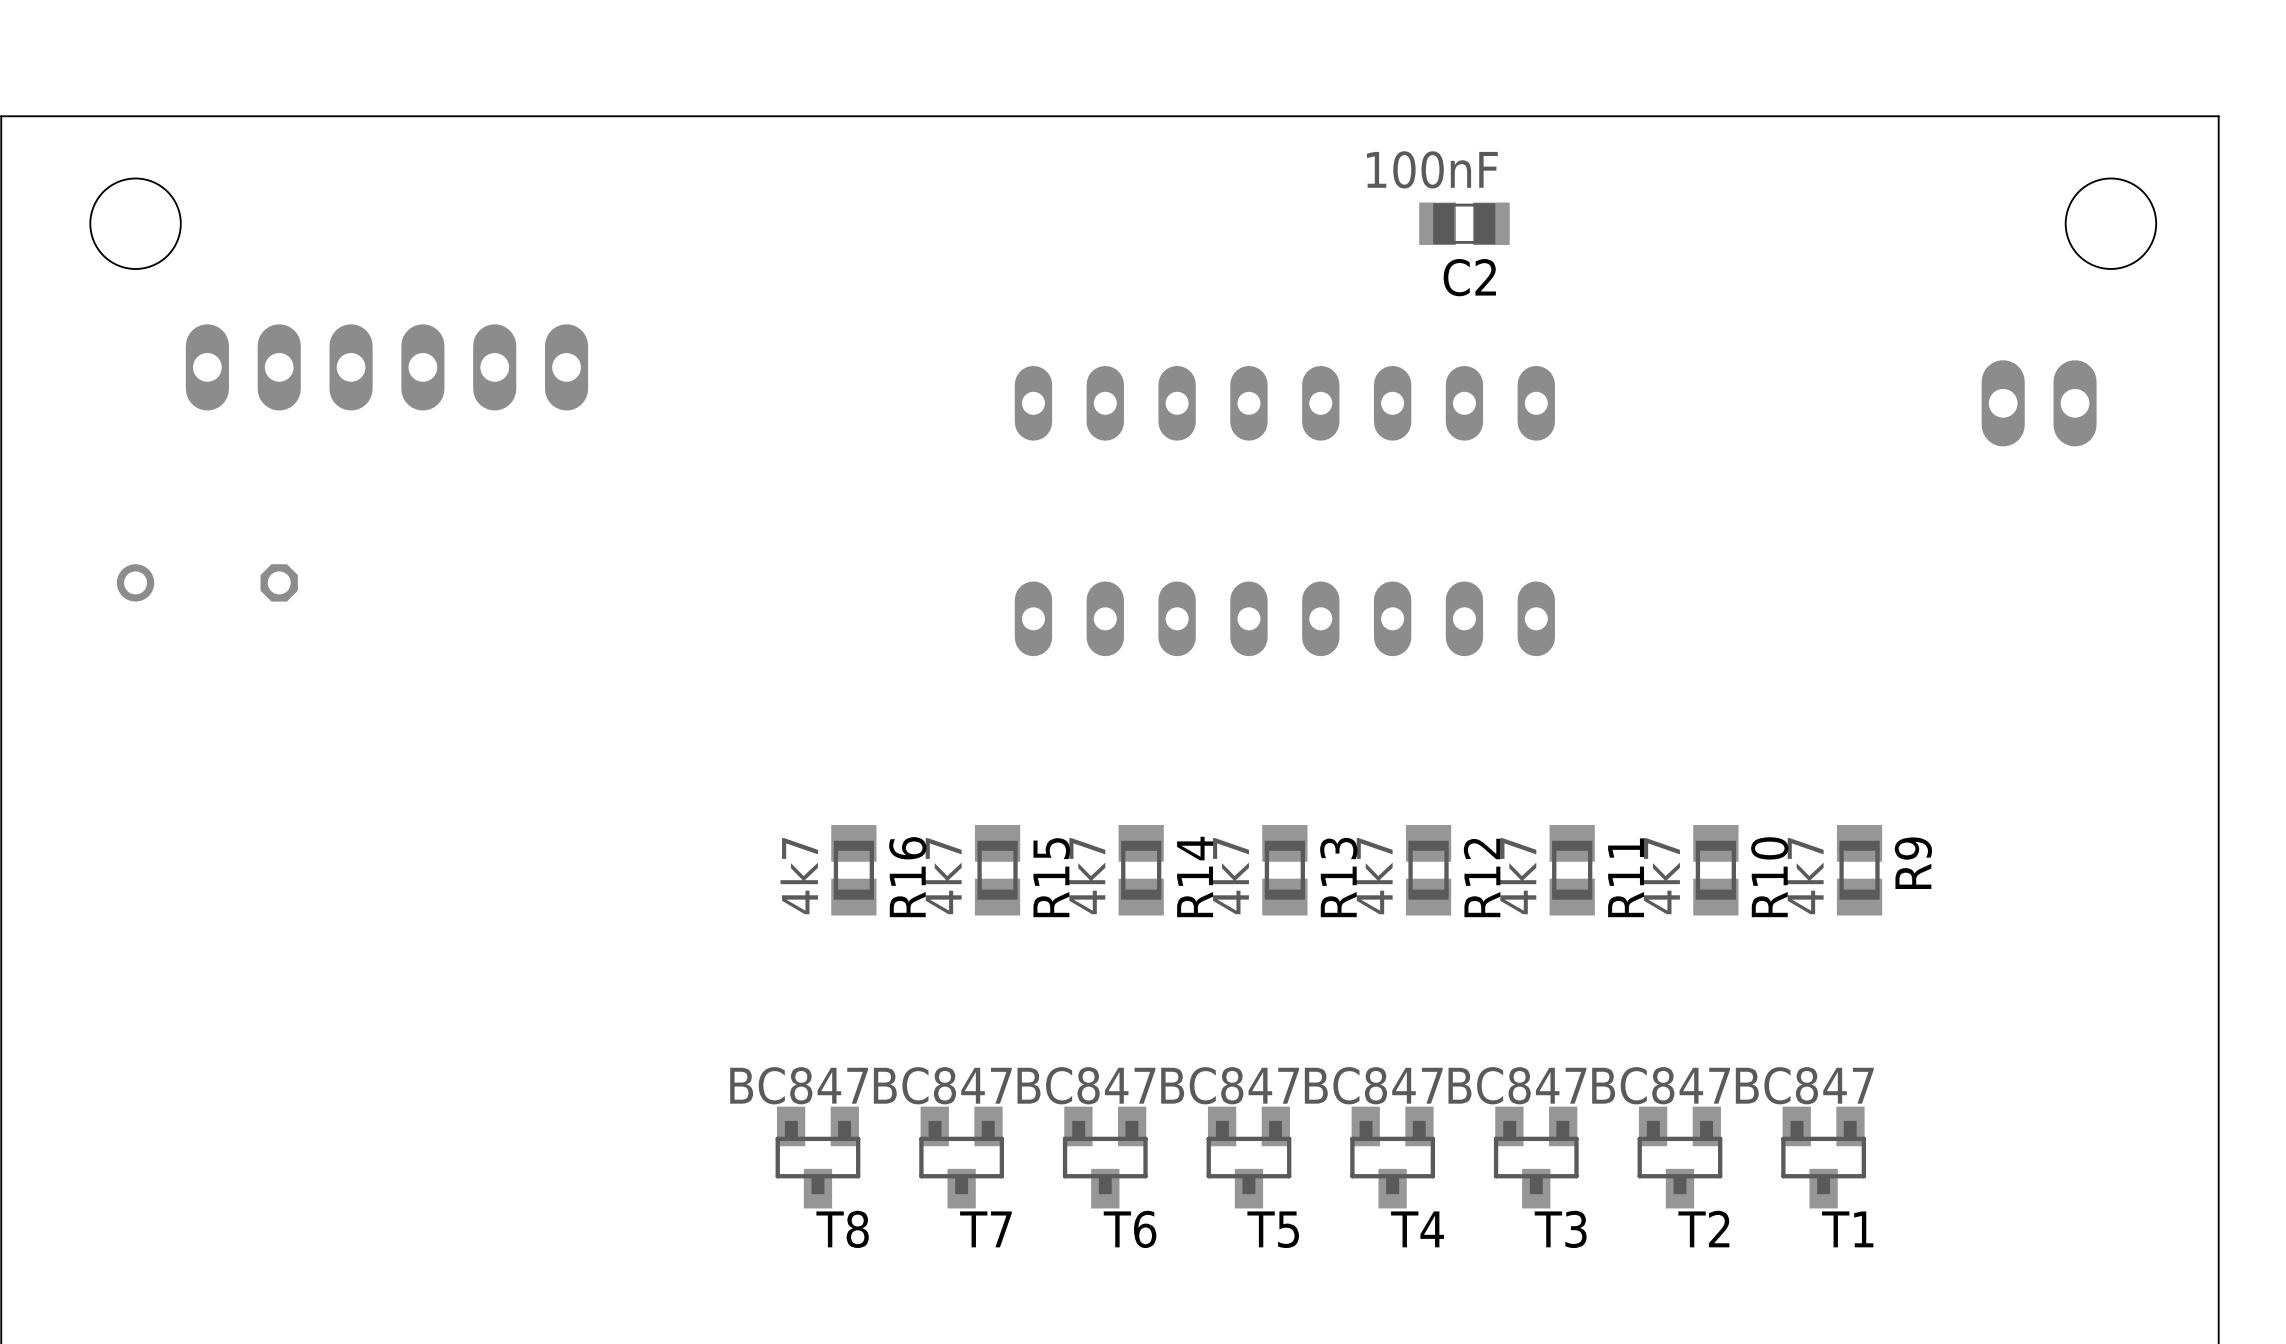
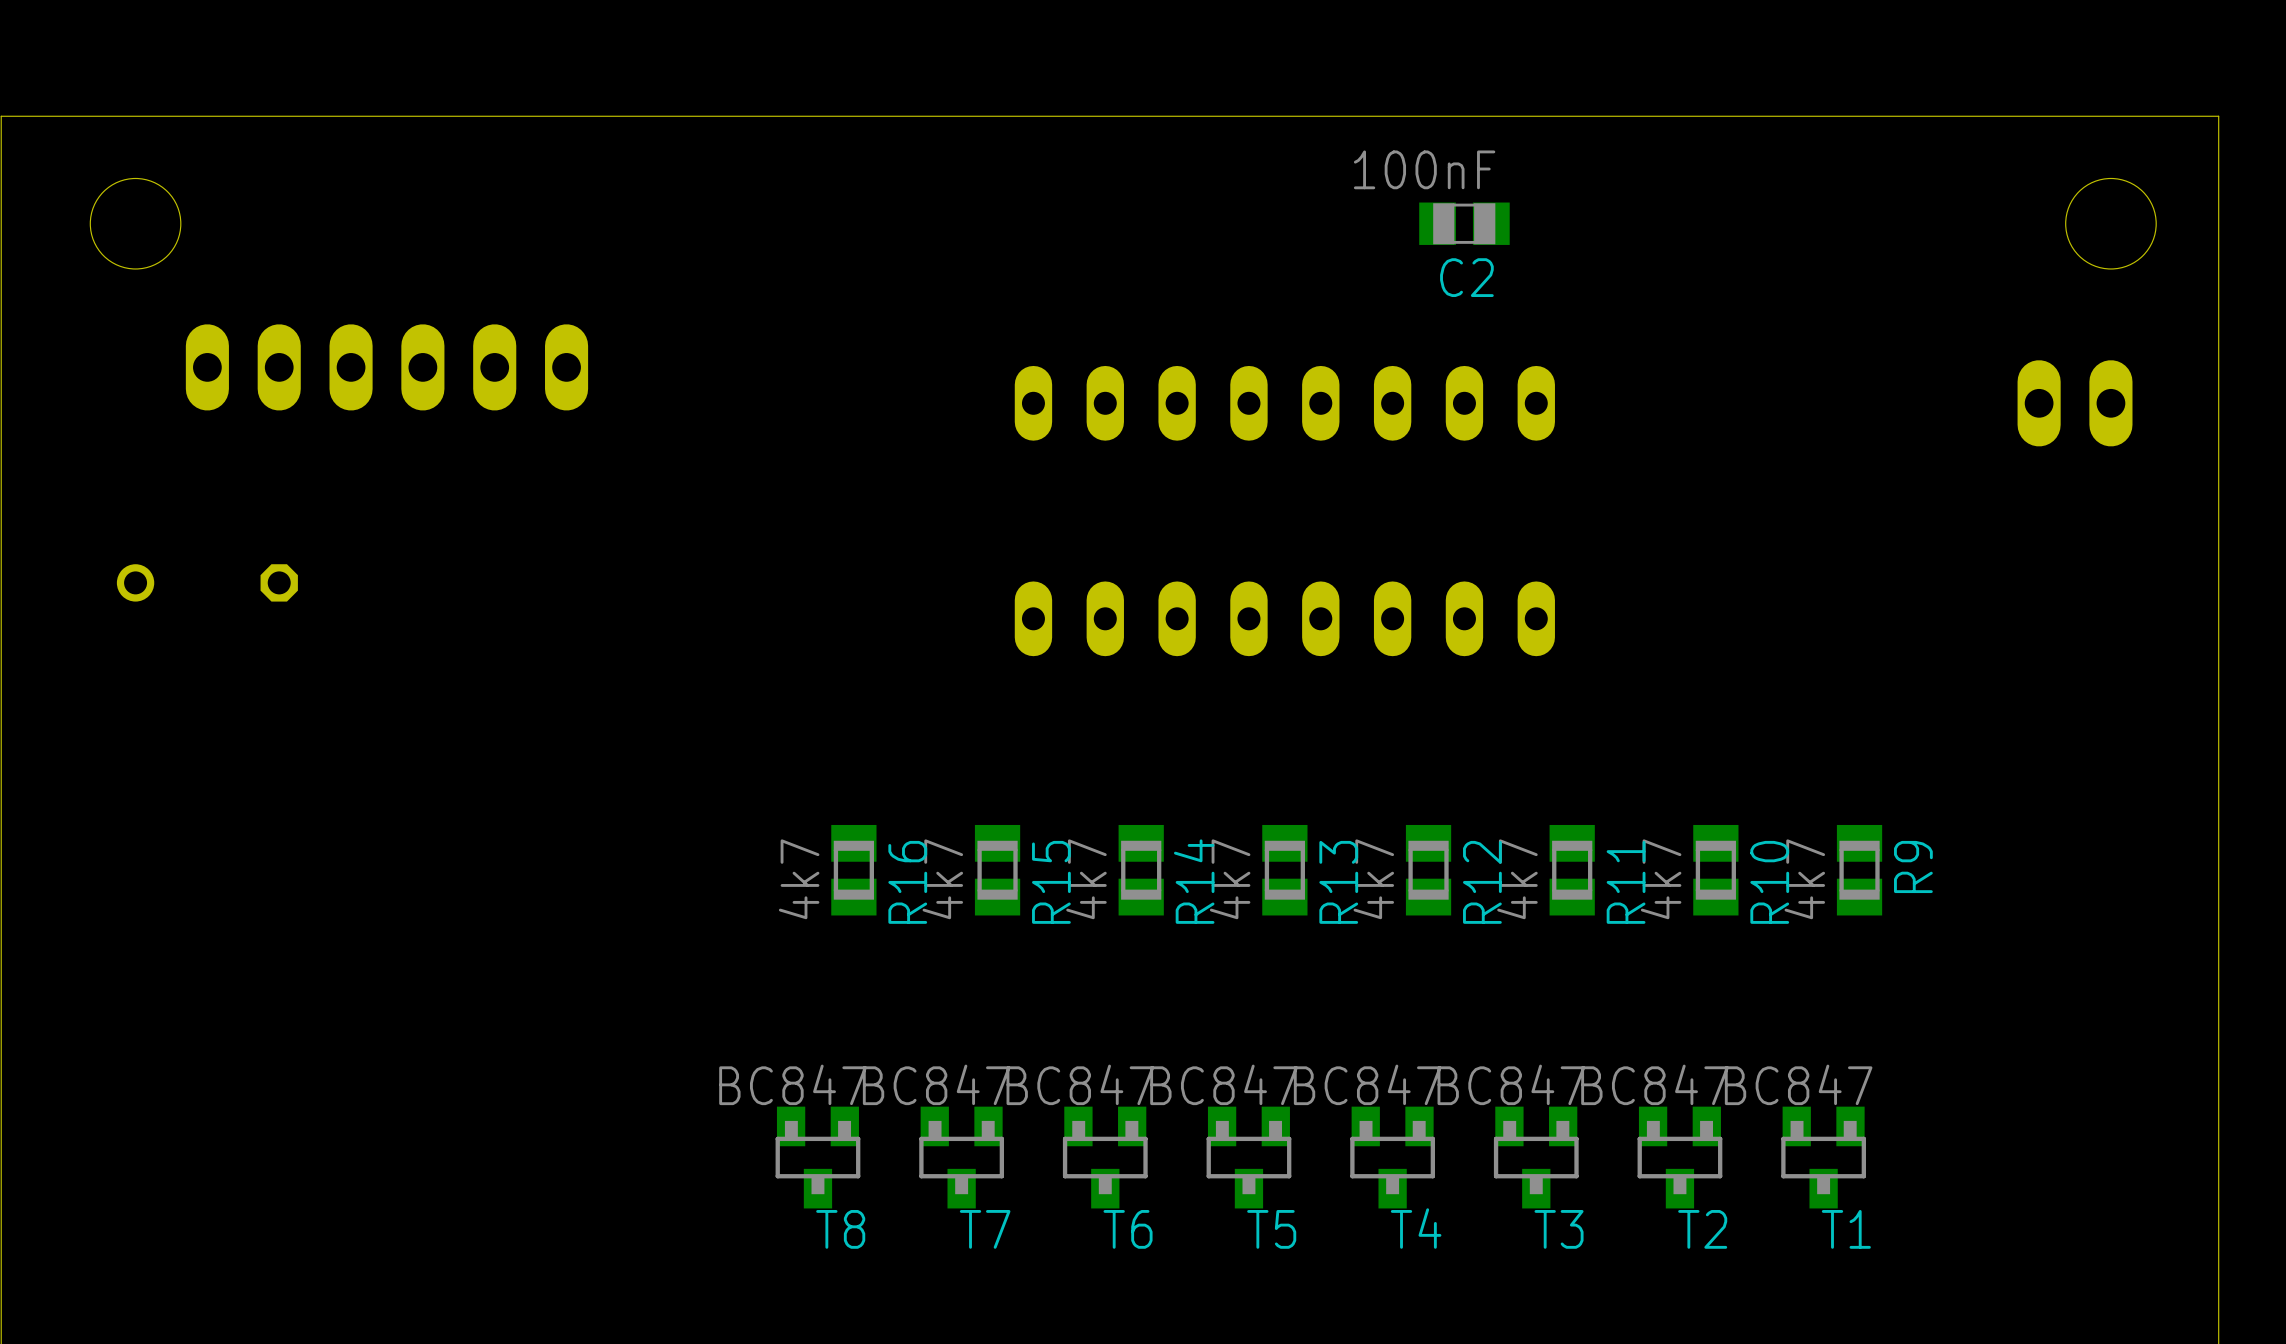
part position: (2039, 403) -> (2075, 403)

